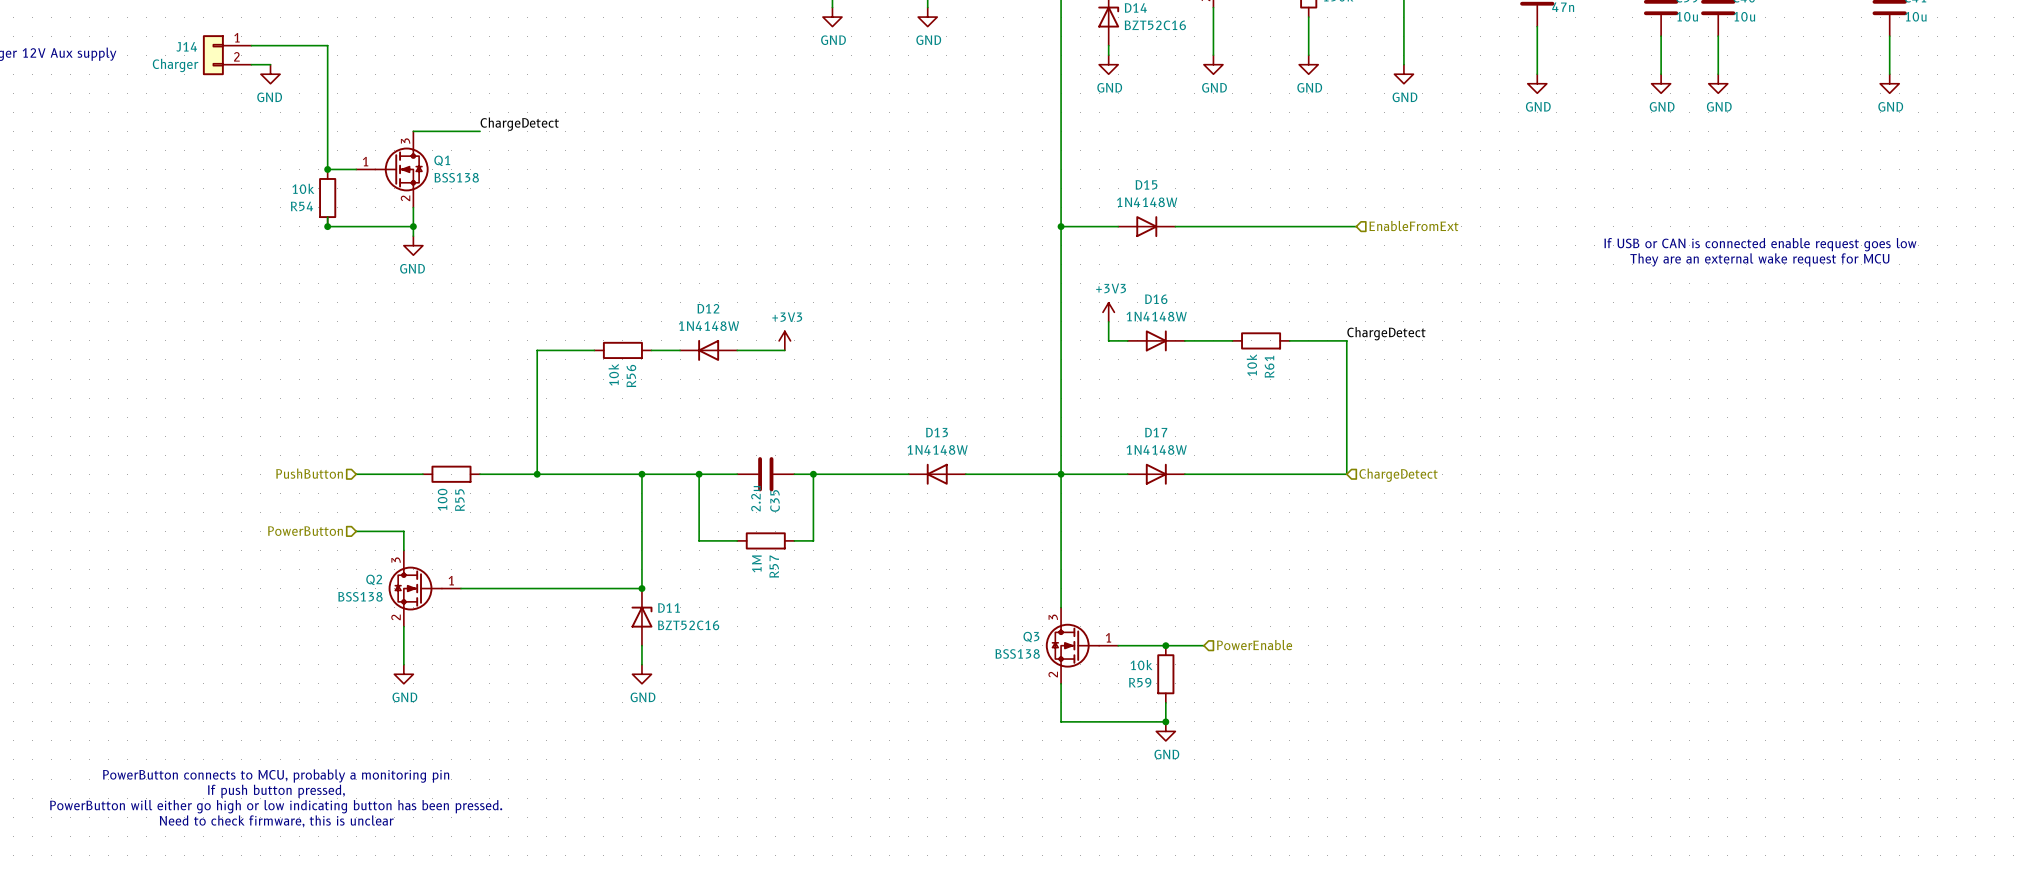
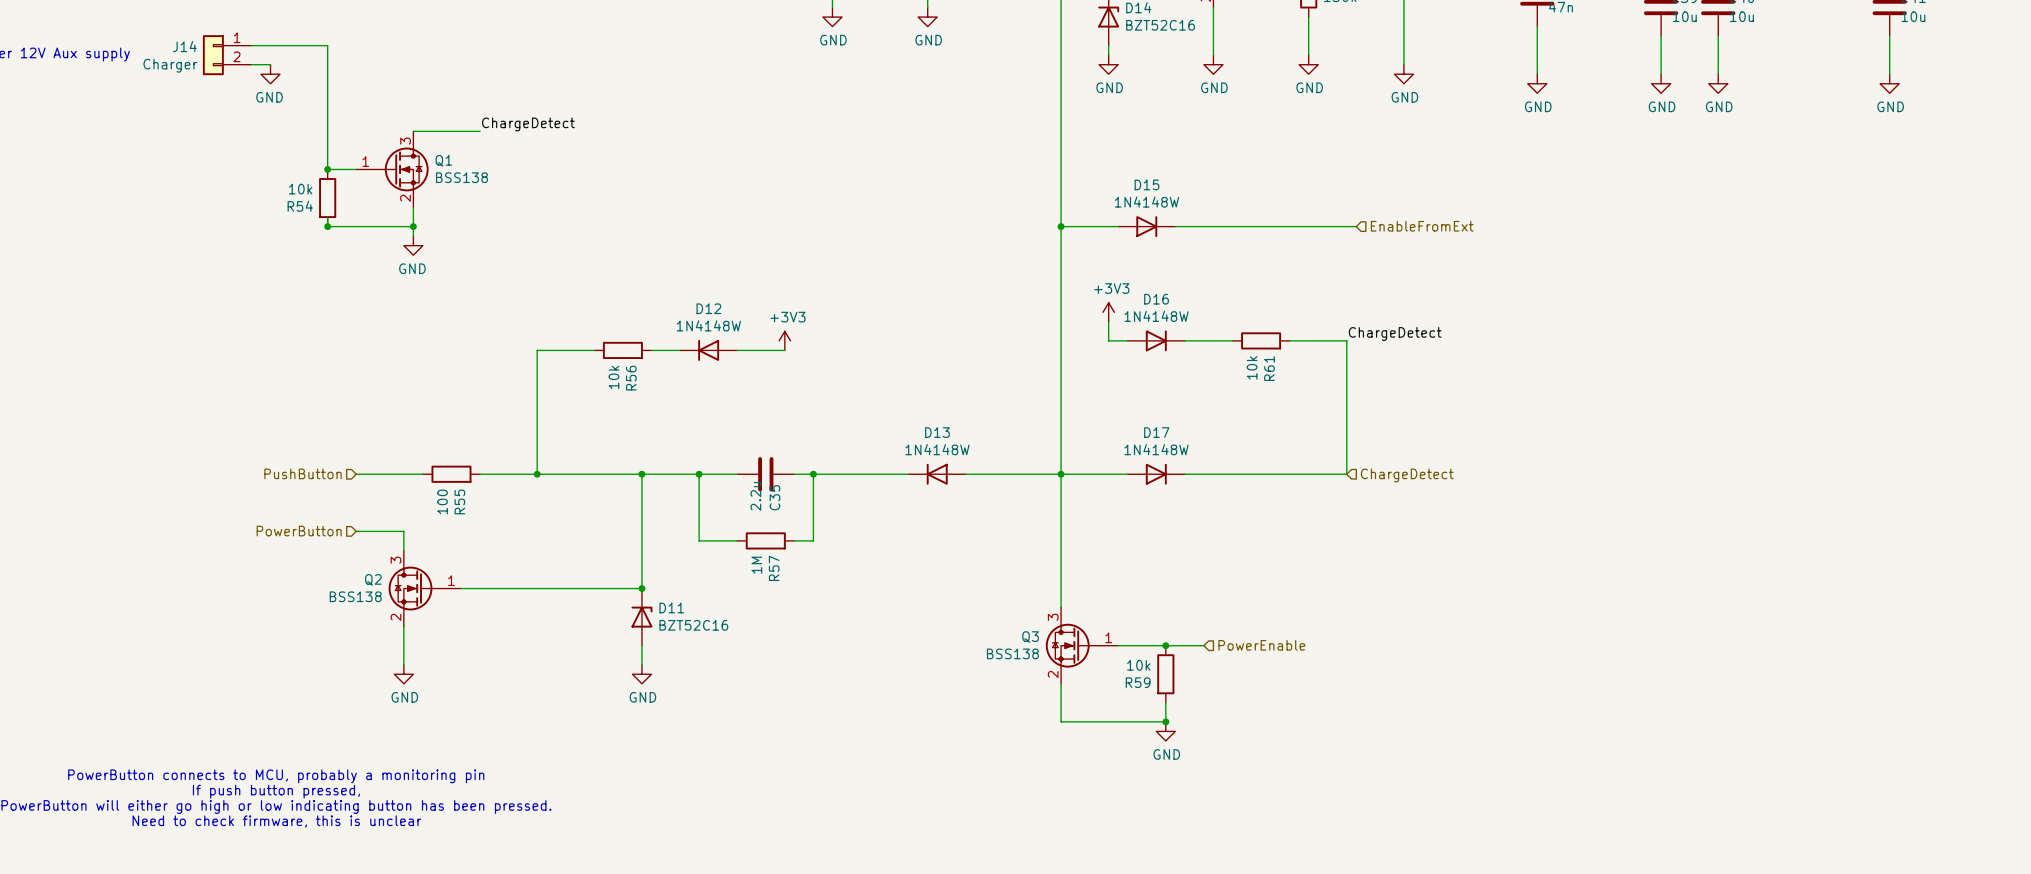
text: If USB or CAN is connected enable request goes low (1760, 244) -> none
text: They are an external wake request for MCU (1759, 259) -> none

